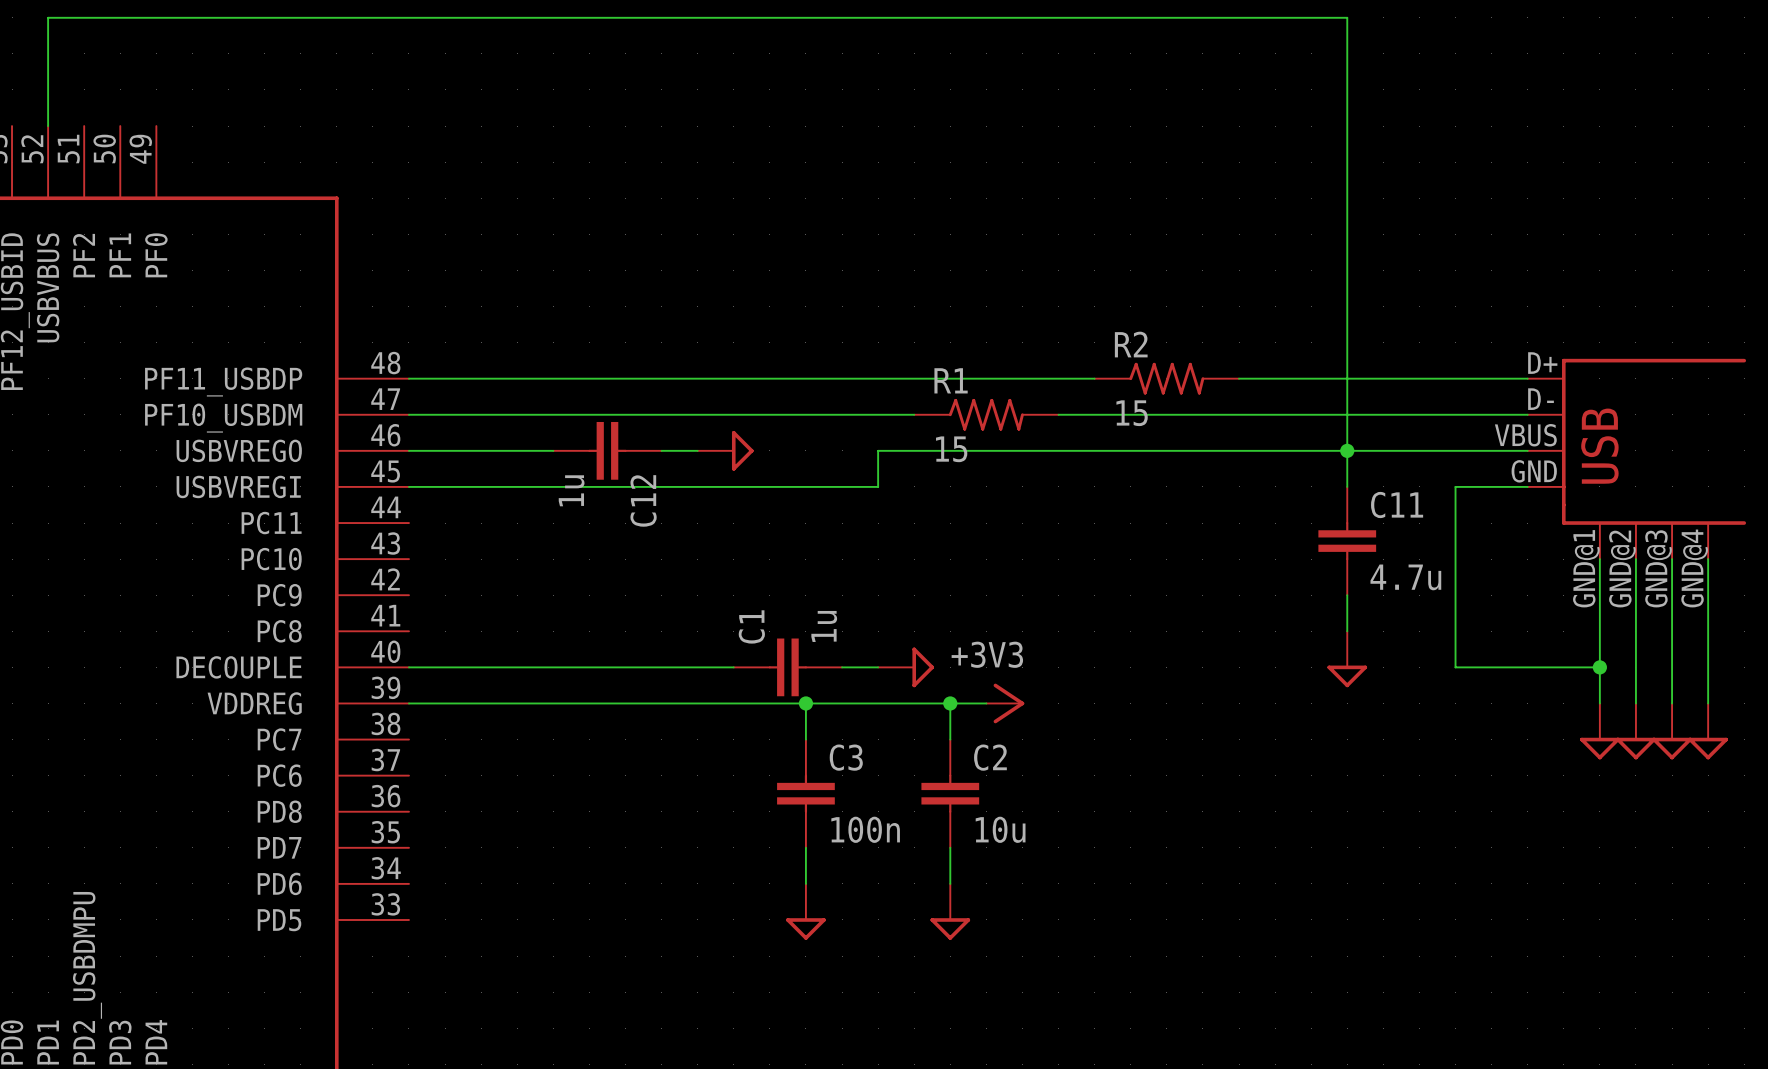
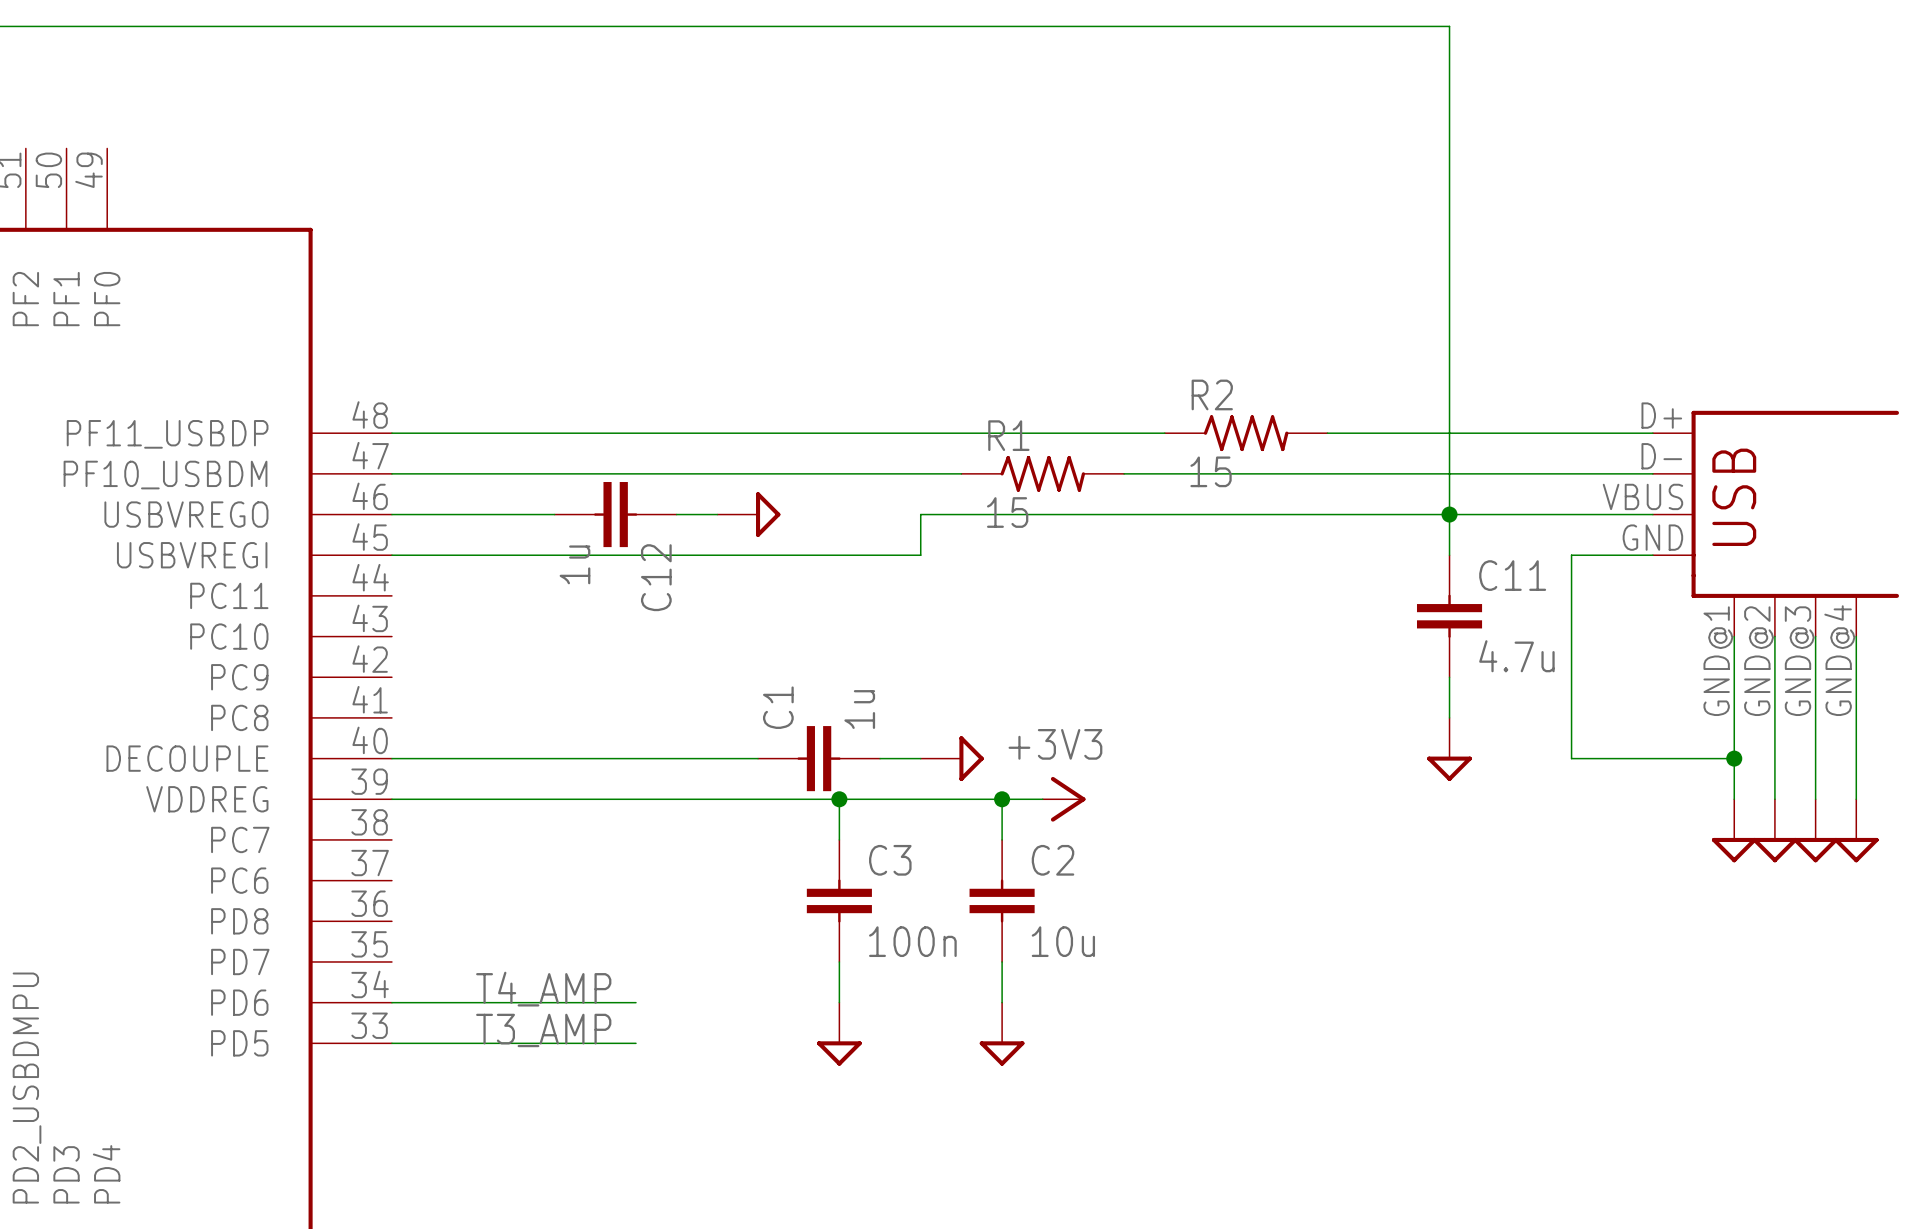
label: none -> T4_AMP (543, 989)
wire: none -> (391, 1002) (636, 1002)
label: none -> T3_AMP (543, 1030)
wire: none -> (391, 1043) (636, 1043)

